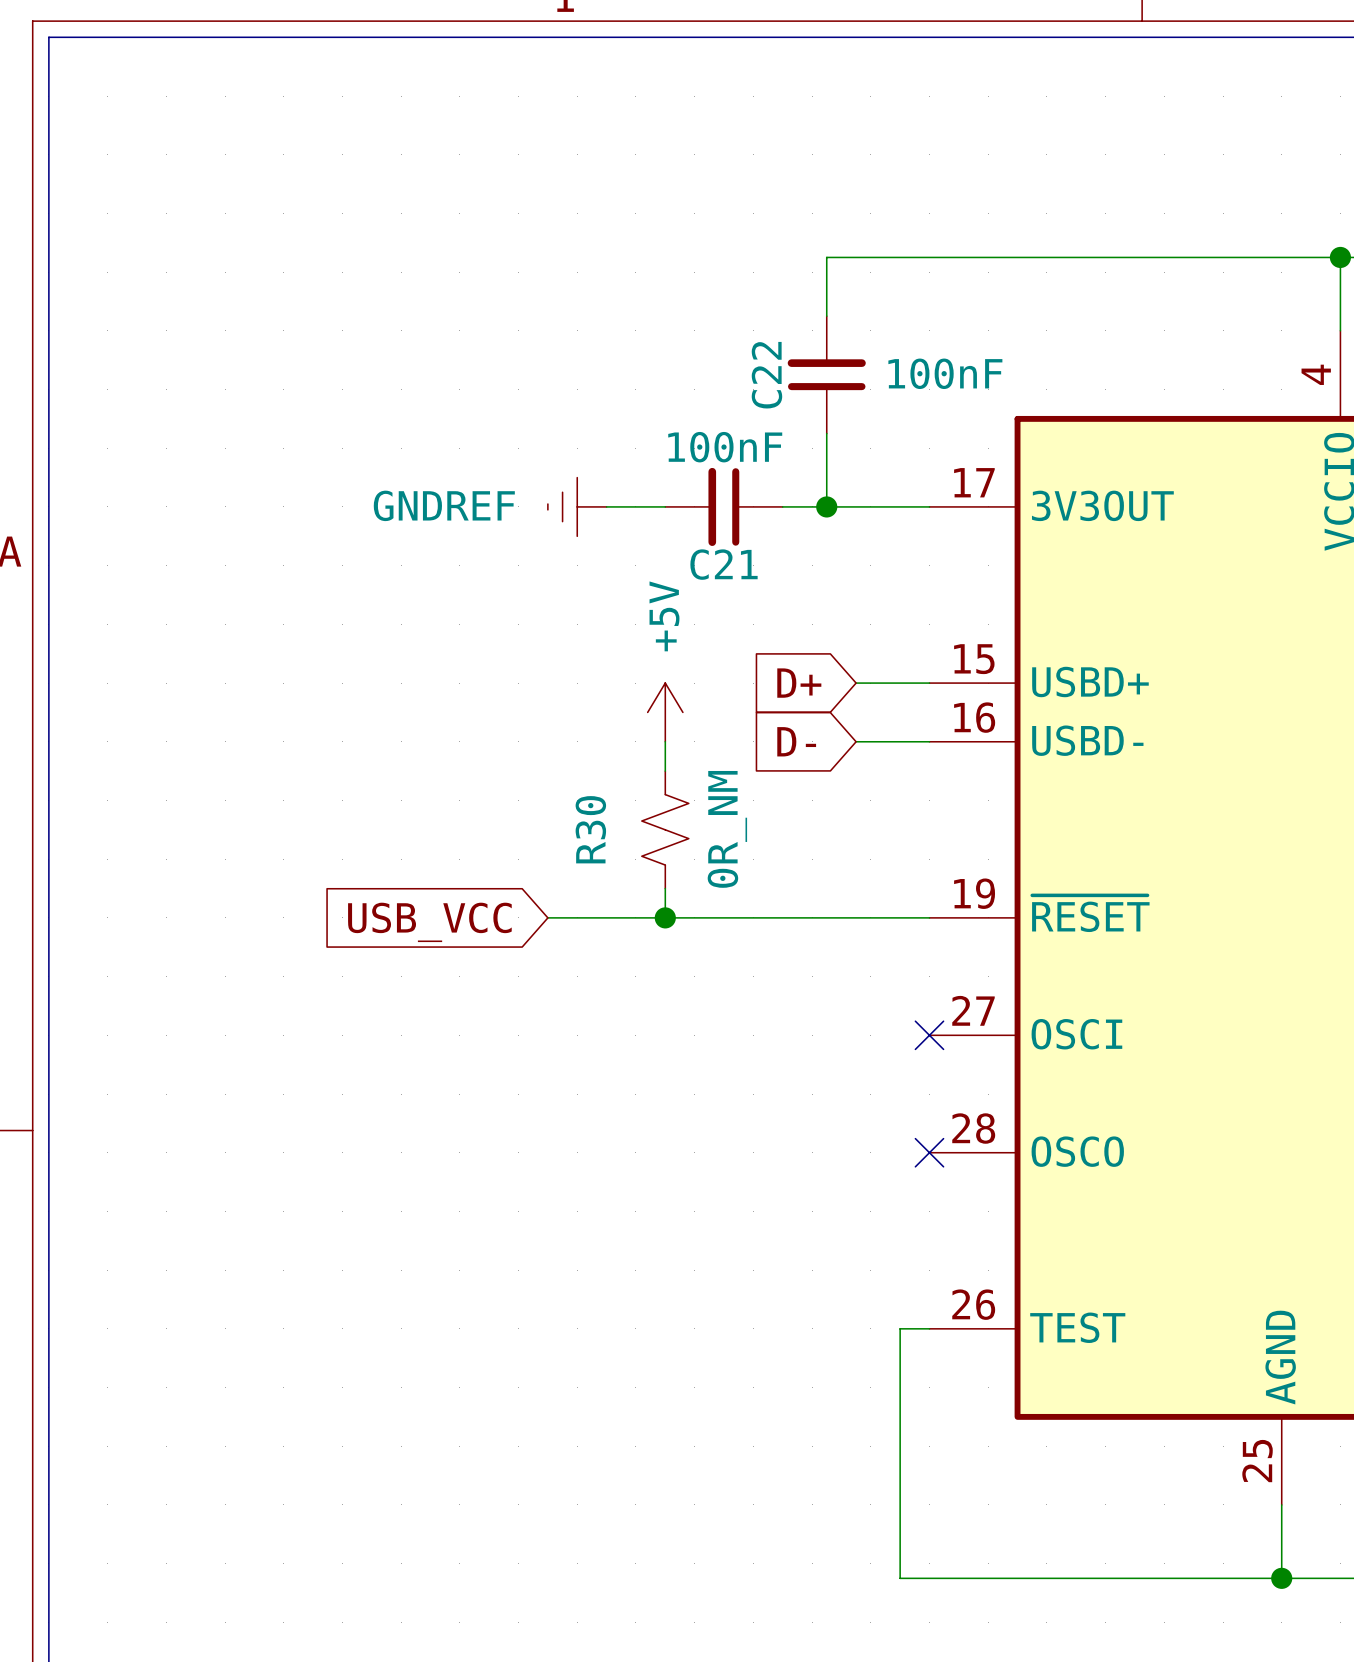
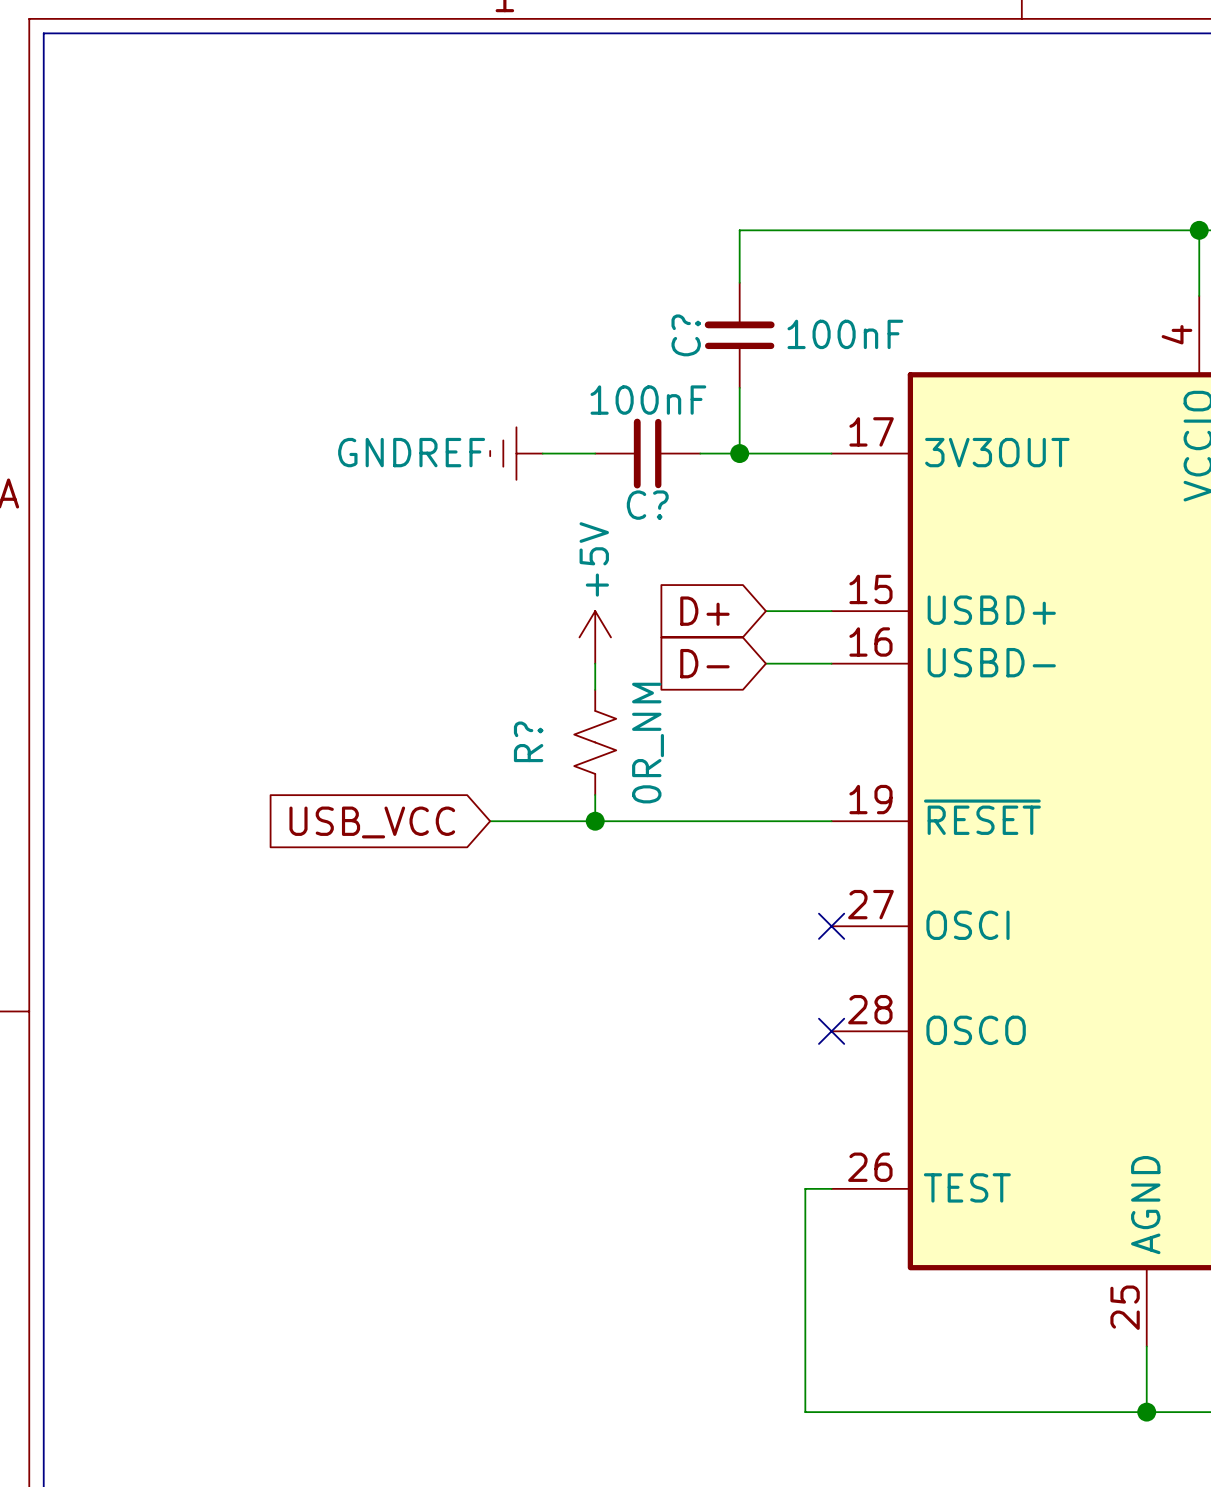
C22 name: C22 (766, 375) -> C? (686, 335)
C21 name: C21 (724, 564) -> C? (647, 505)
R30 name: R30 (590, 829) -> R? (528, 741)

